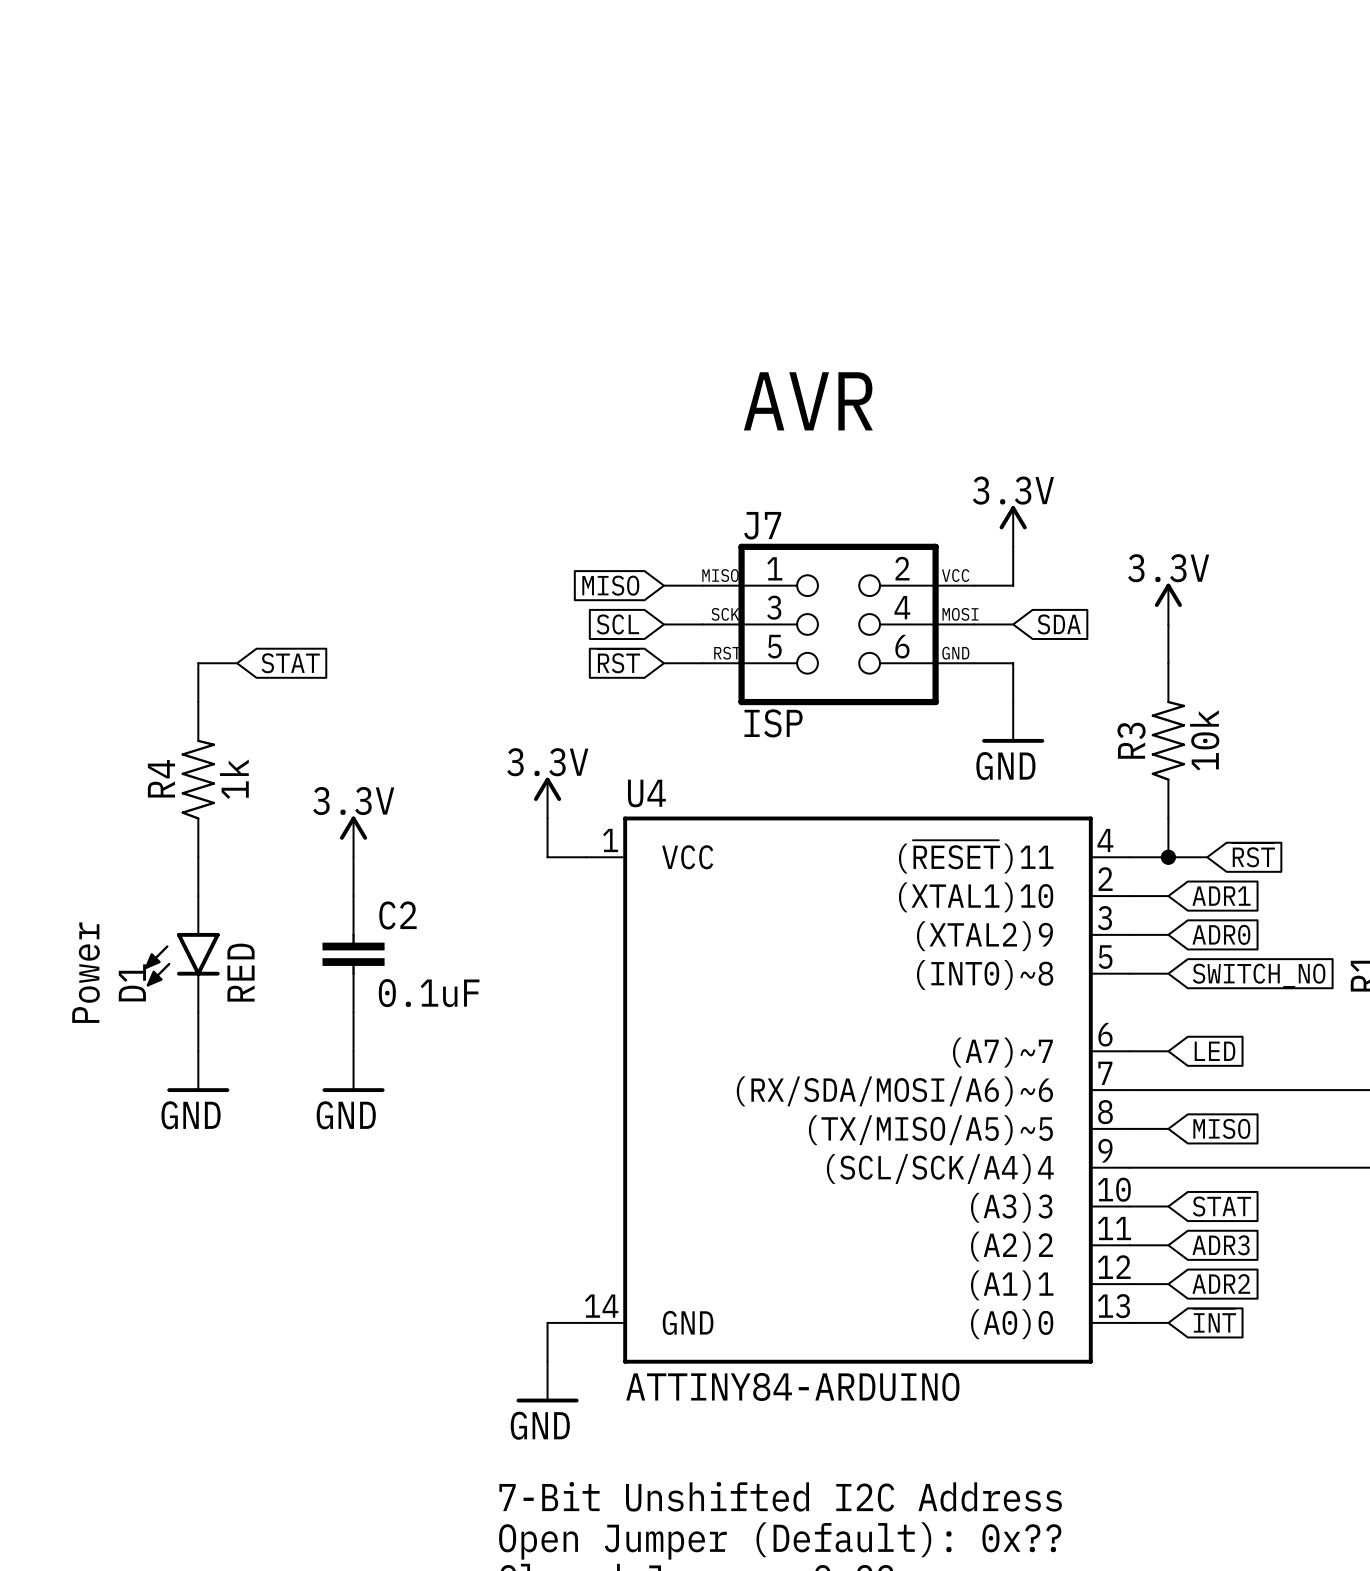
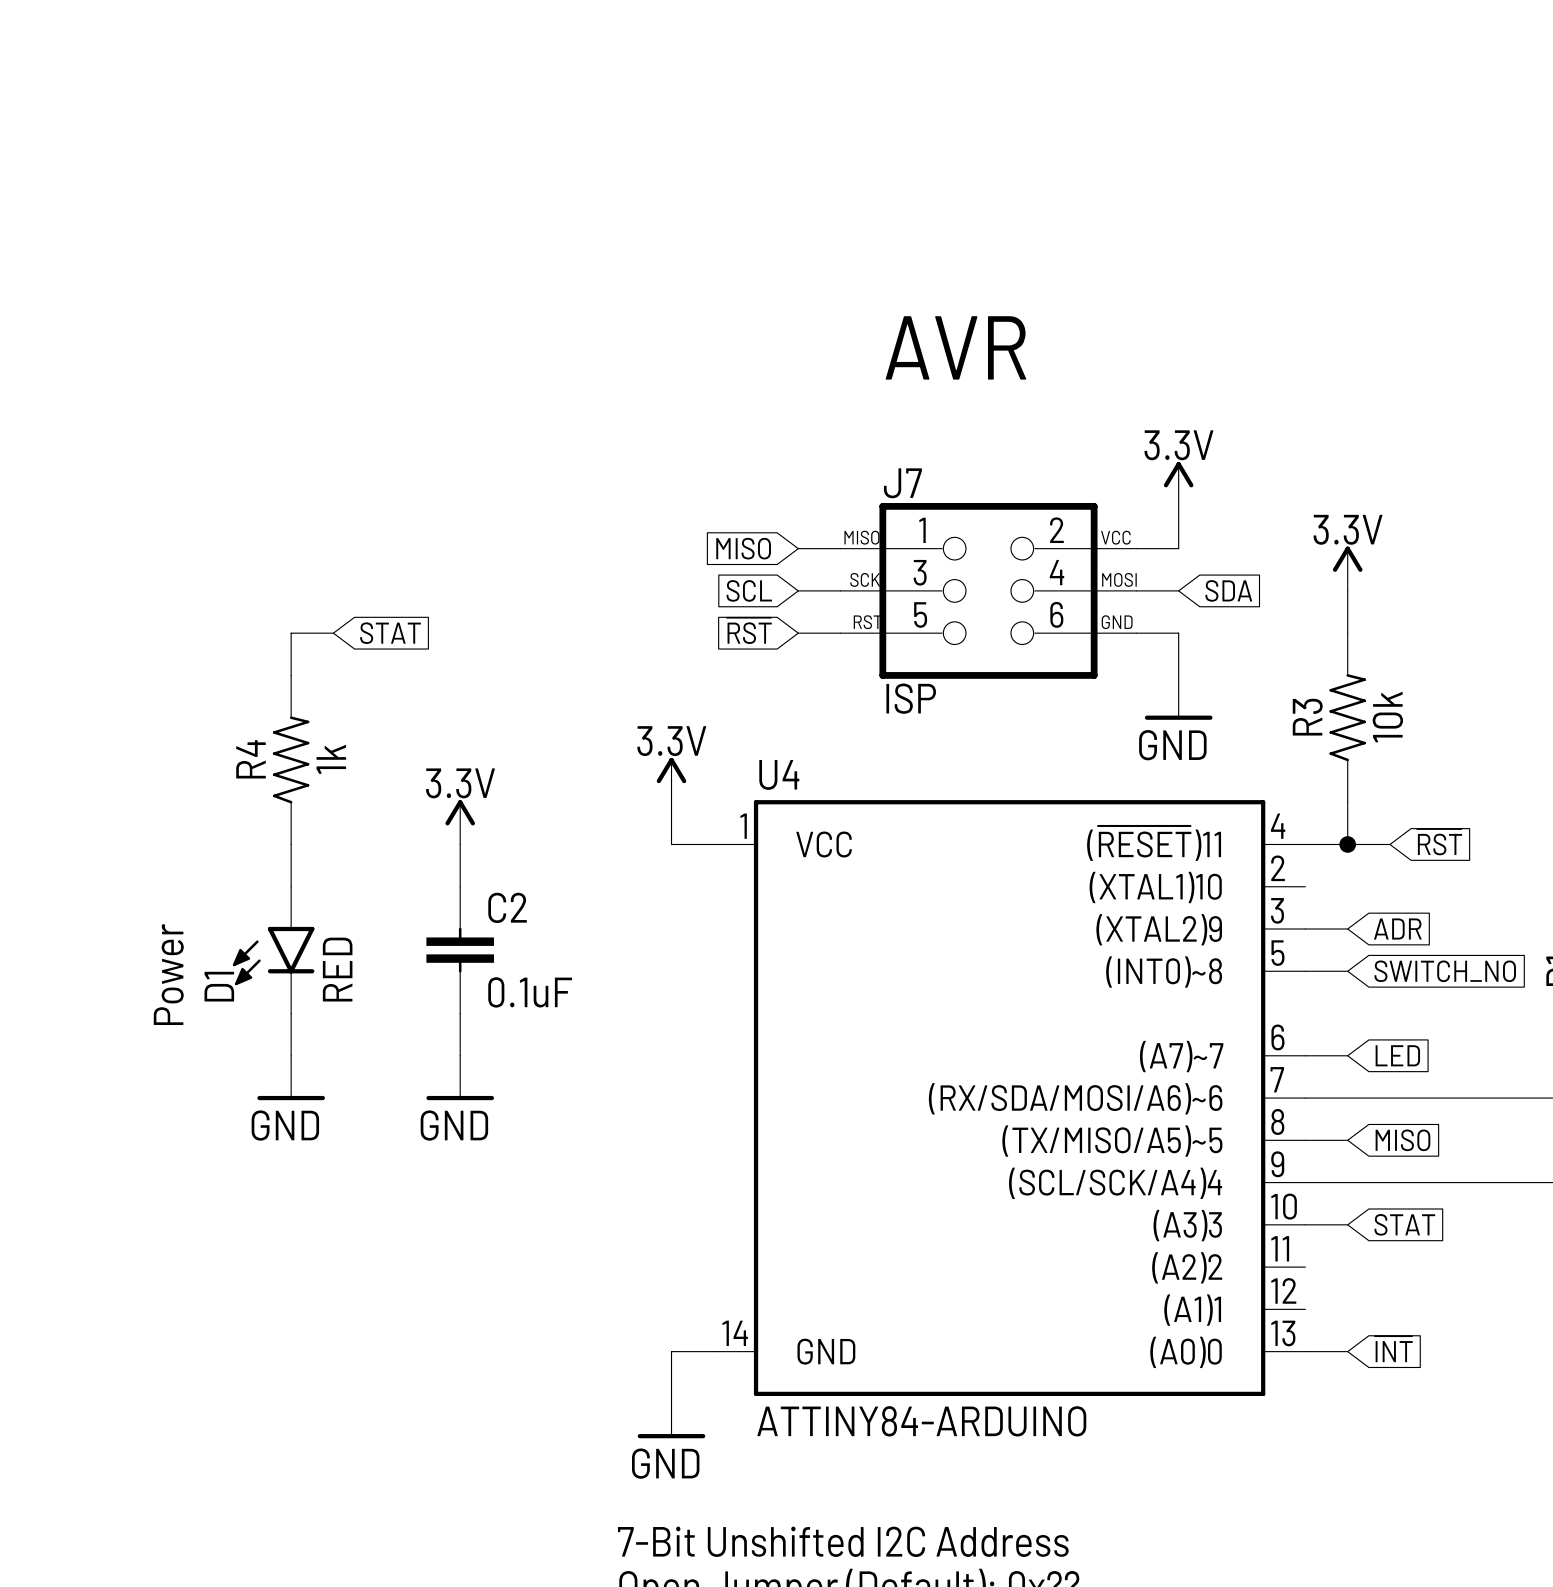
wire: (1129, 896) (1168, 896) -> none
global label: ADR1 (1221, 896) -> none
global label: ADR0 (1221, 934) -> ADR (1397, 929)
wire: (1129, 1245) (1168, 1245) -> none
global label: ADR3 (1221, 1245) -> none
global label: ADR2 (1221, 1283) -> none
wire: (1129, 1284) (1168, 1284) -> none

